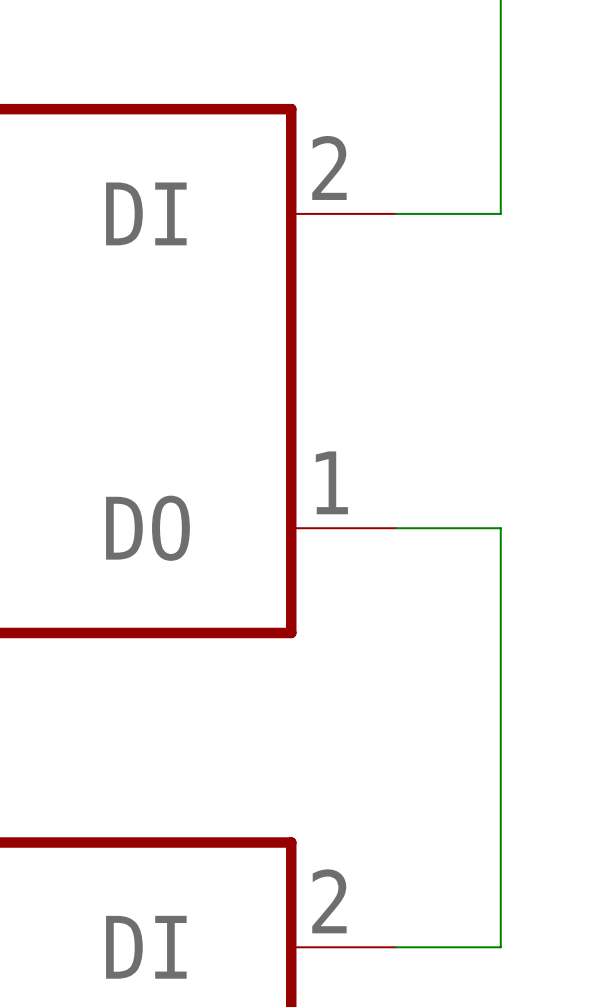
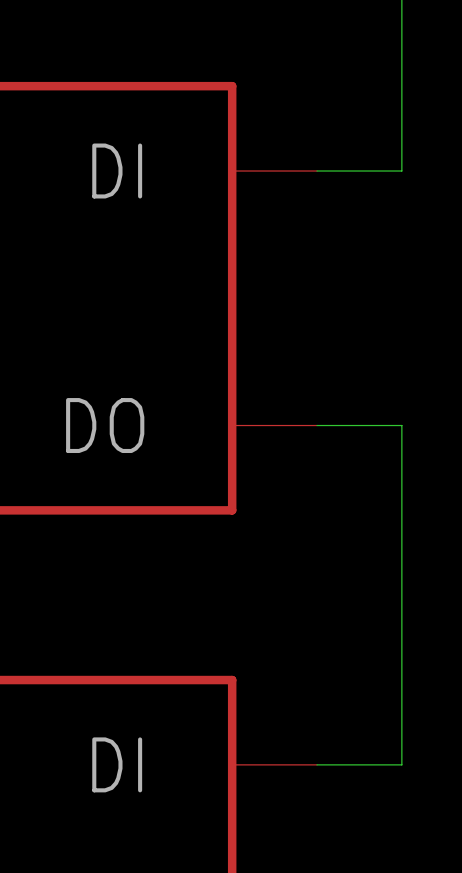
part pin number: 2 (329, 167) -> none
part pin number: 1 (331, 482) -> none
part pin number: 2 (329, 901) -> none

